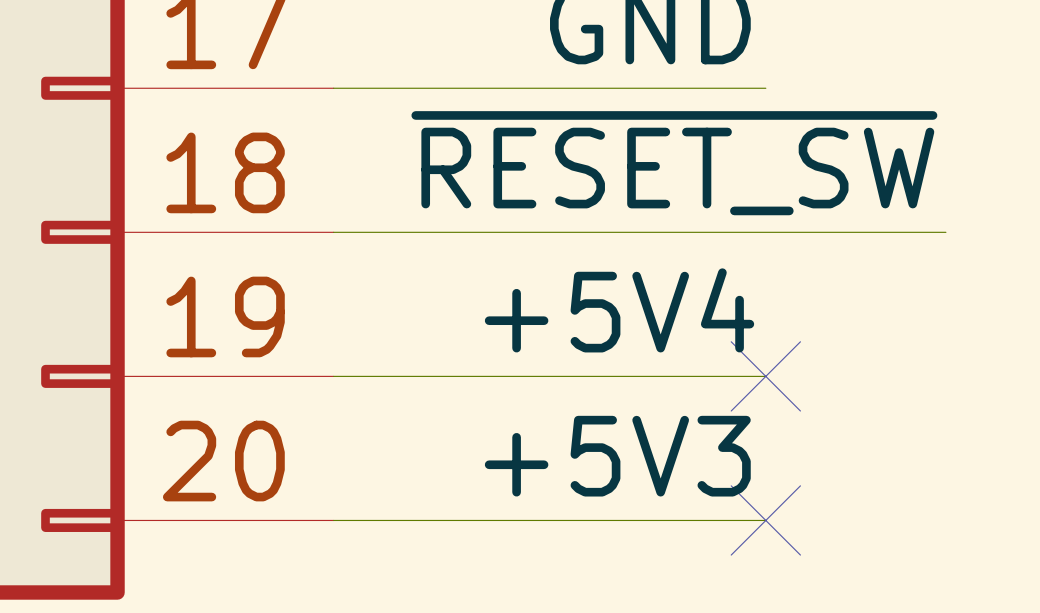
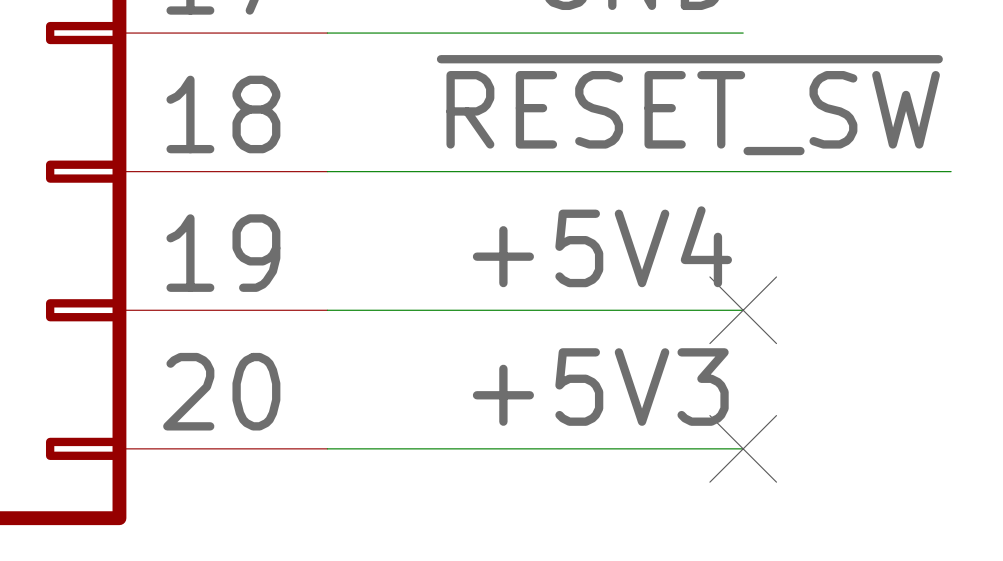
label position: ~{RESET_SW} (674, 163) -> ~{RESET_SW} (689, 105)
wire: none -> (916, 171) (951, 171)

